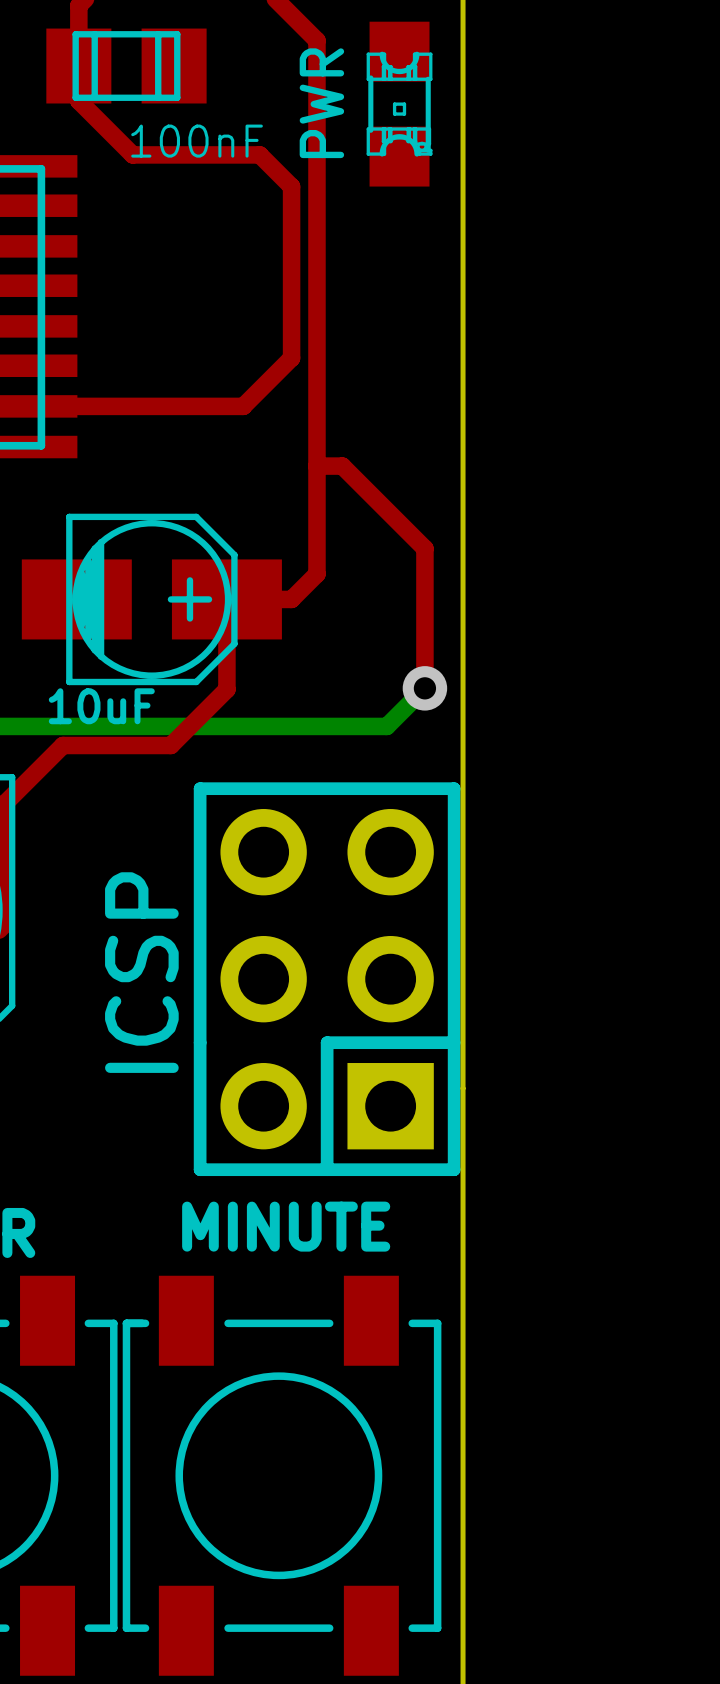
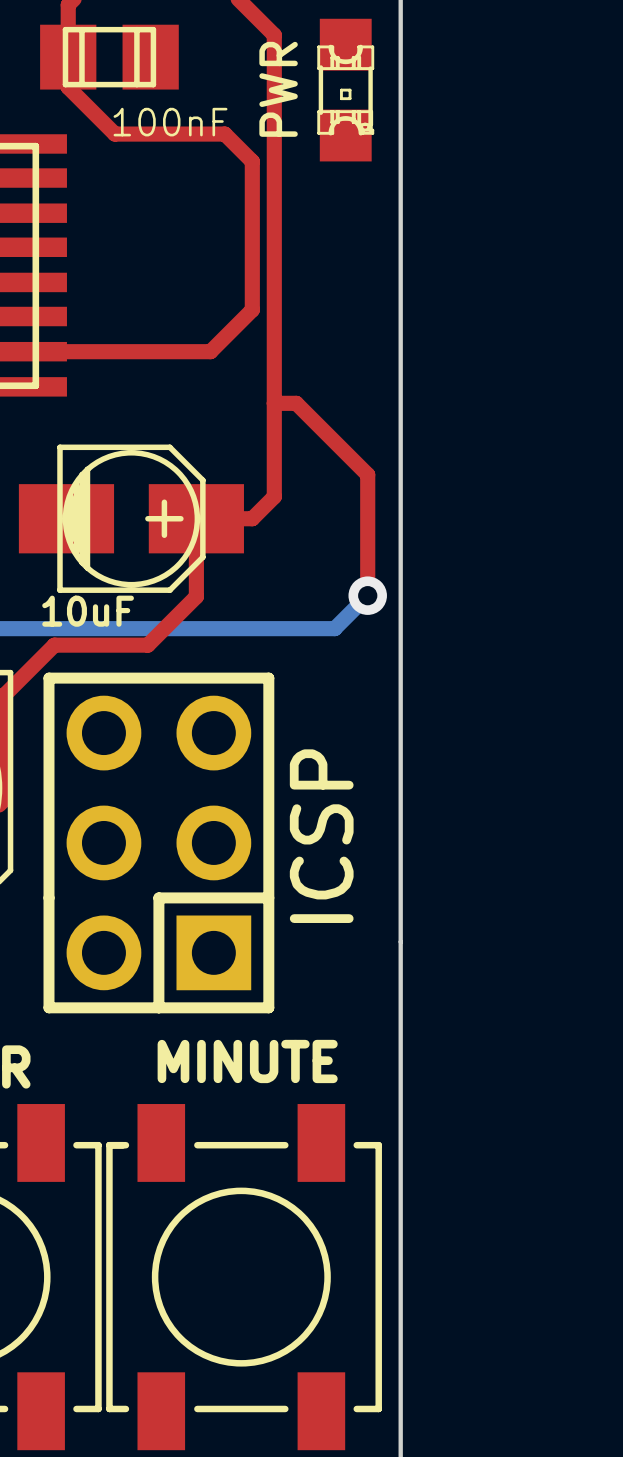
part value position: ICSP (141, 972) -> ICSP (321, 836)
part position: (327, 979) -> (158, 842)

